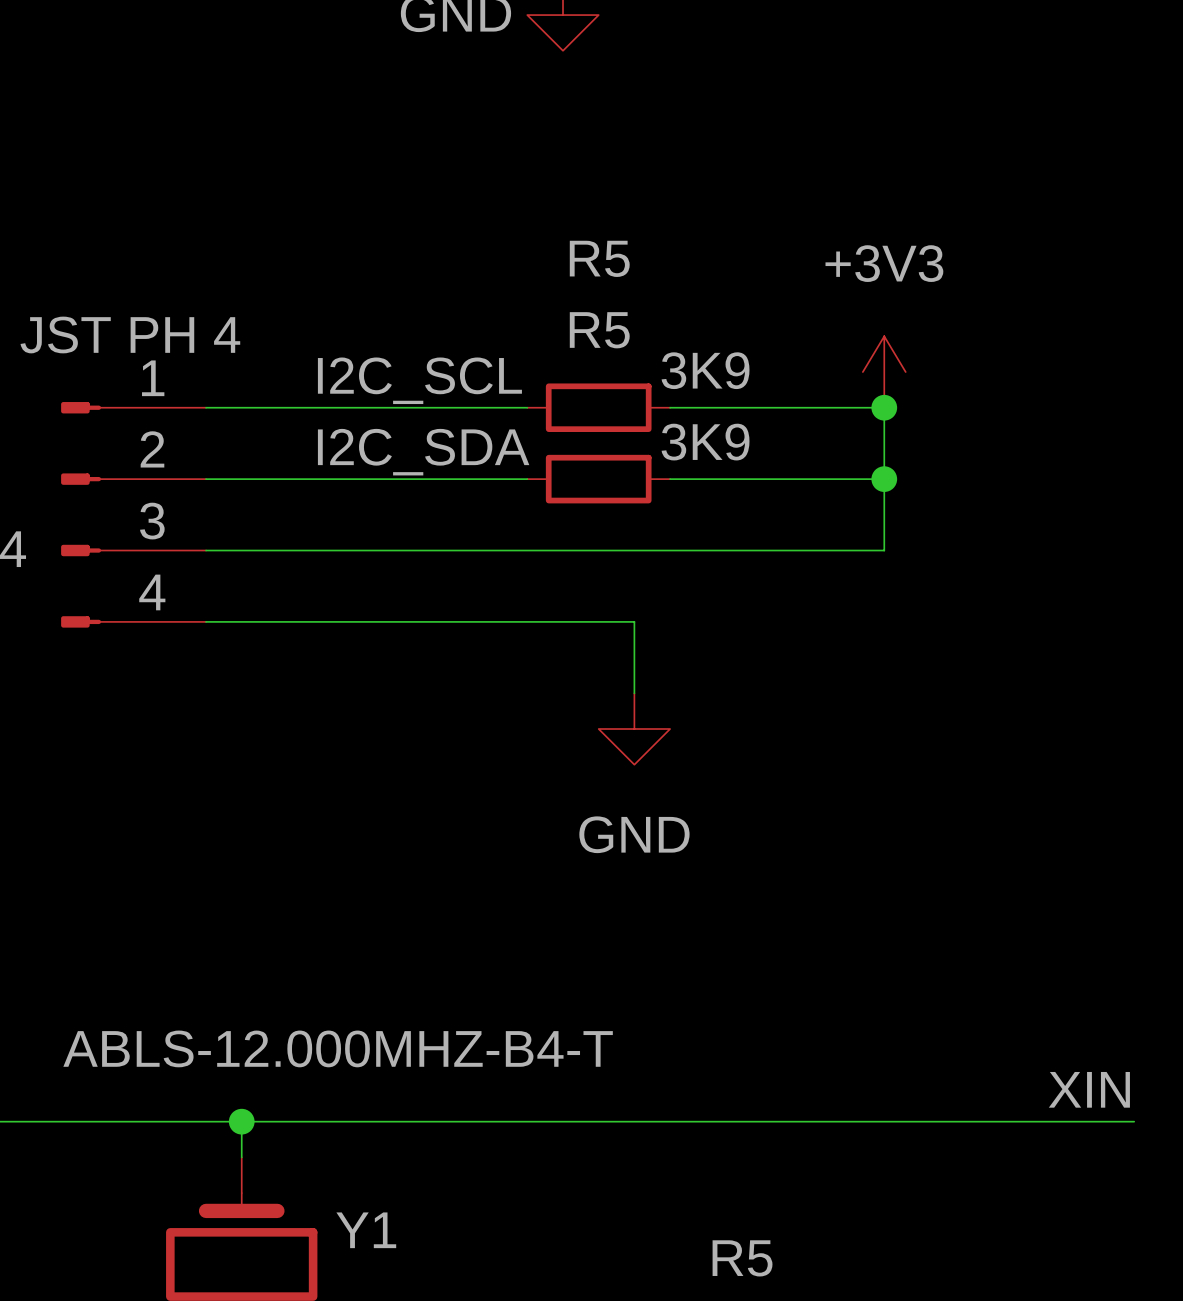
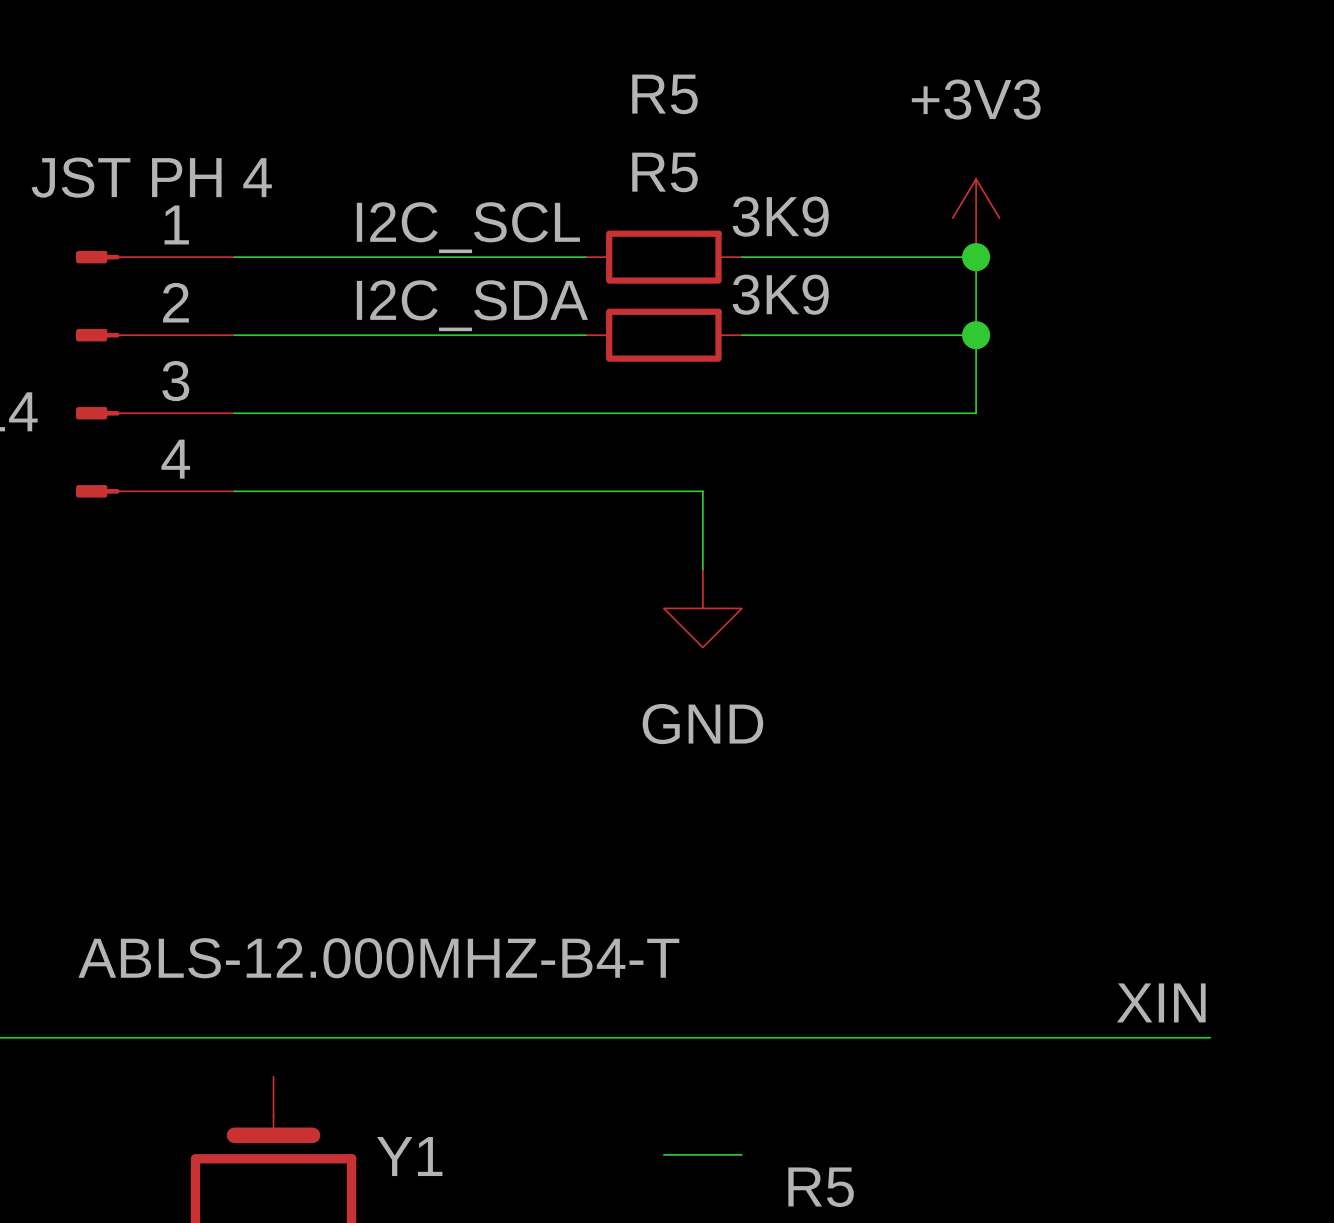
label position: XIN (1089, 1089) -> XIN (1161, 1002)
wire: (241, 1121) (241, 1157) -> none
junction: (241, 1121) -> none
wire: (1098, 1121) (1134, 1121) -> none
wire: none -> (663, 1154) (741, 1154)

